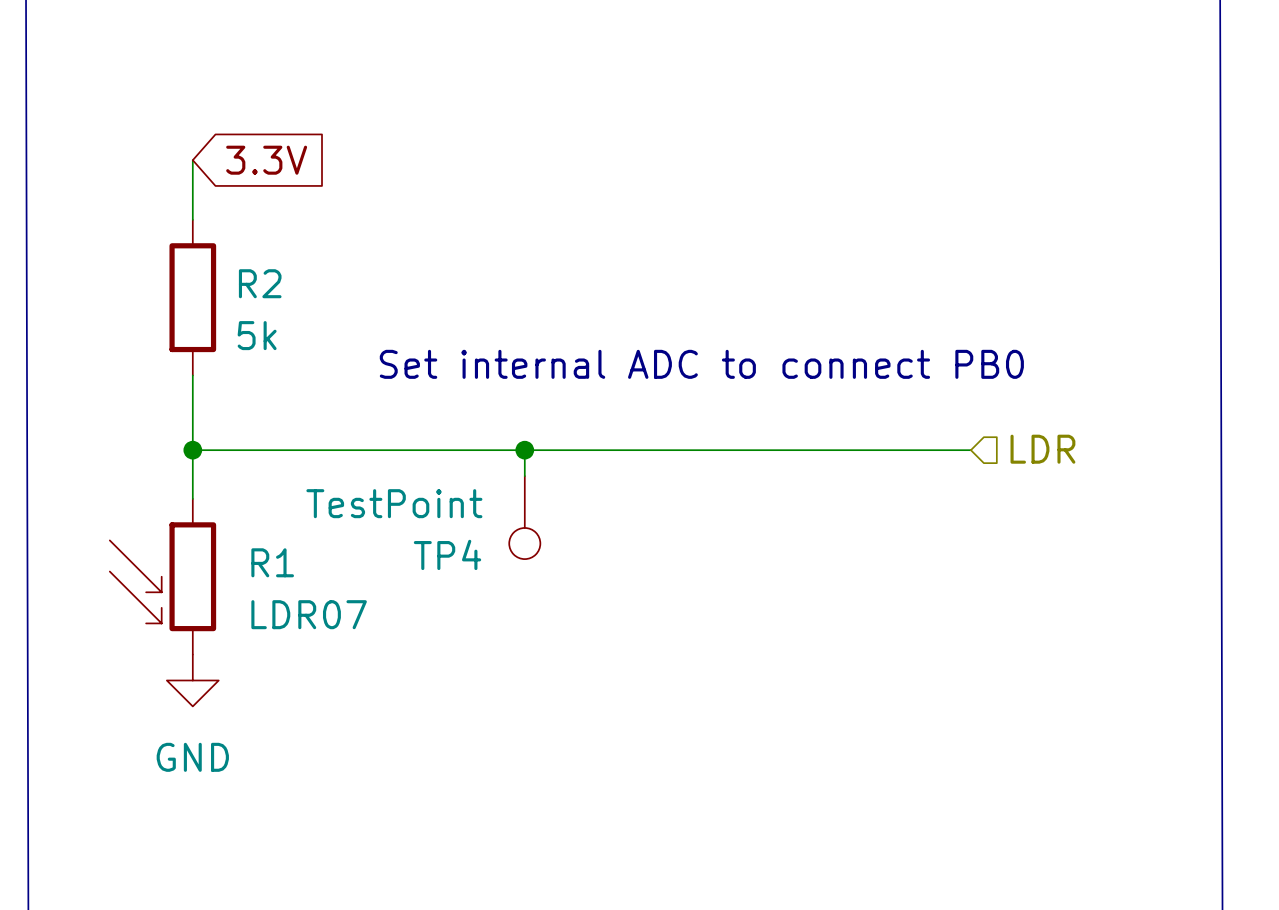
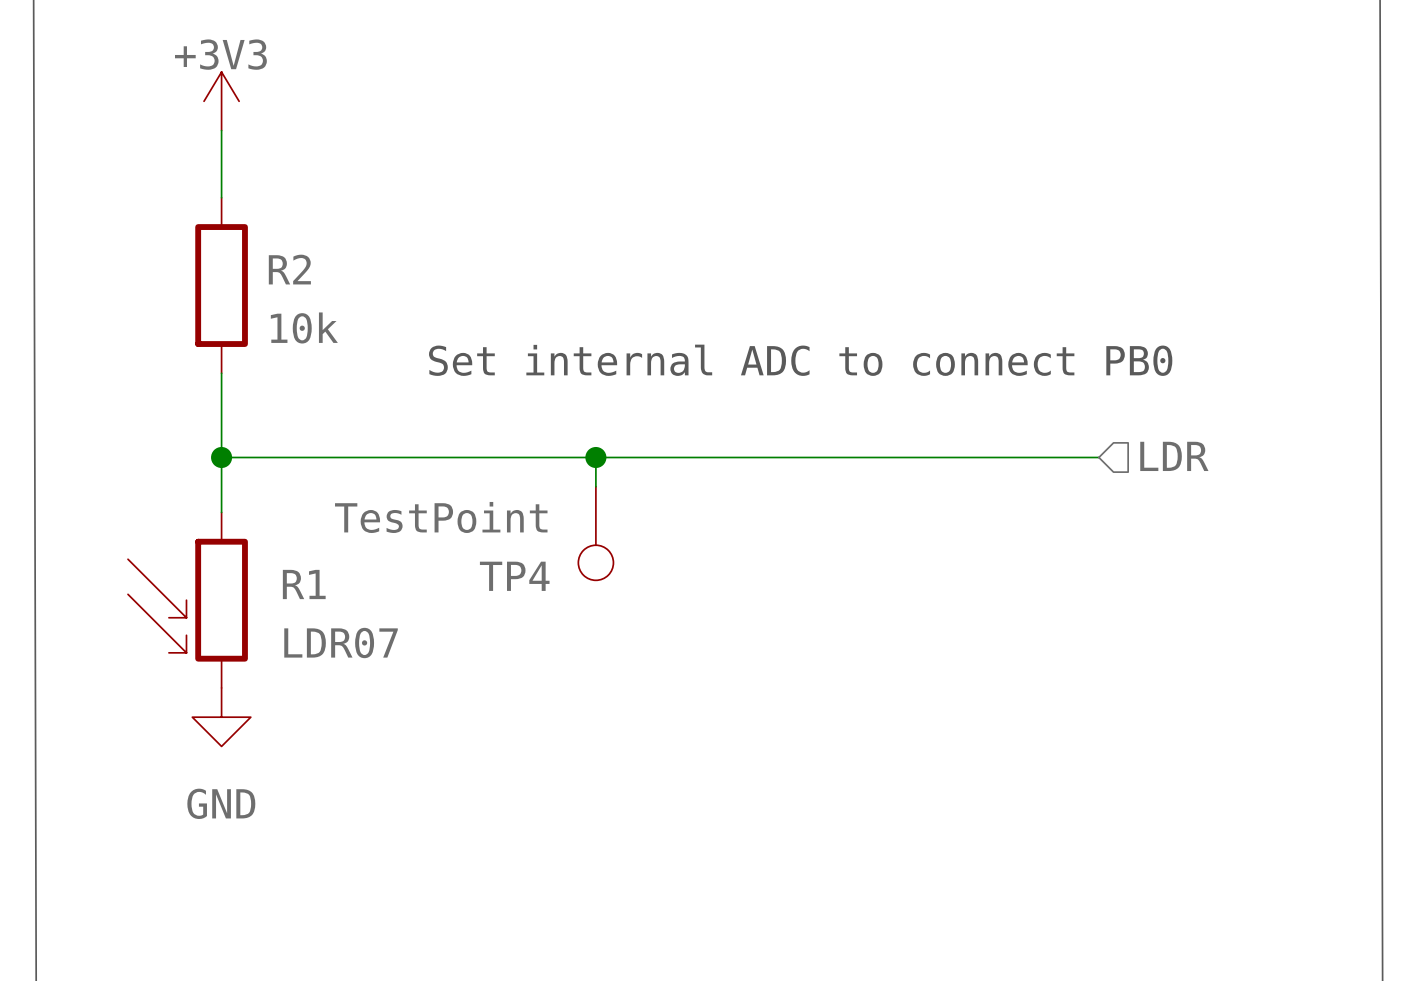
power symbol: none -> +3V3 (221, 101)
global label: 3.3V (266, 160) -> none
R2 value: 5k (257, 335) -> 10k (304, 327)

